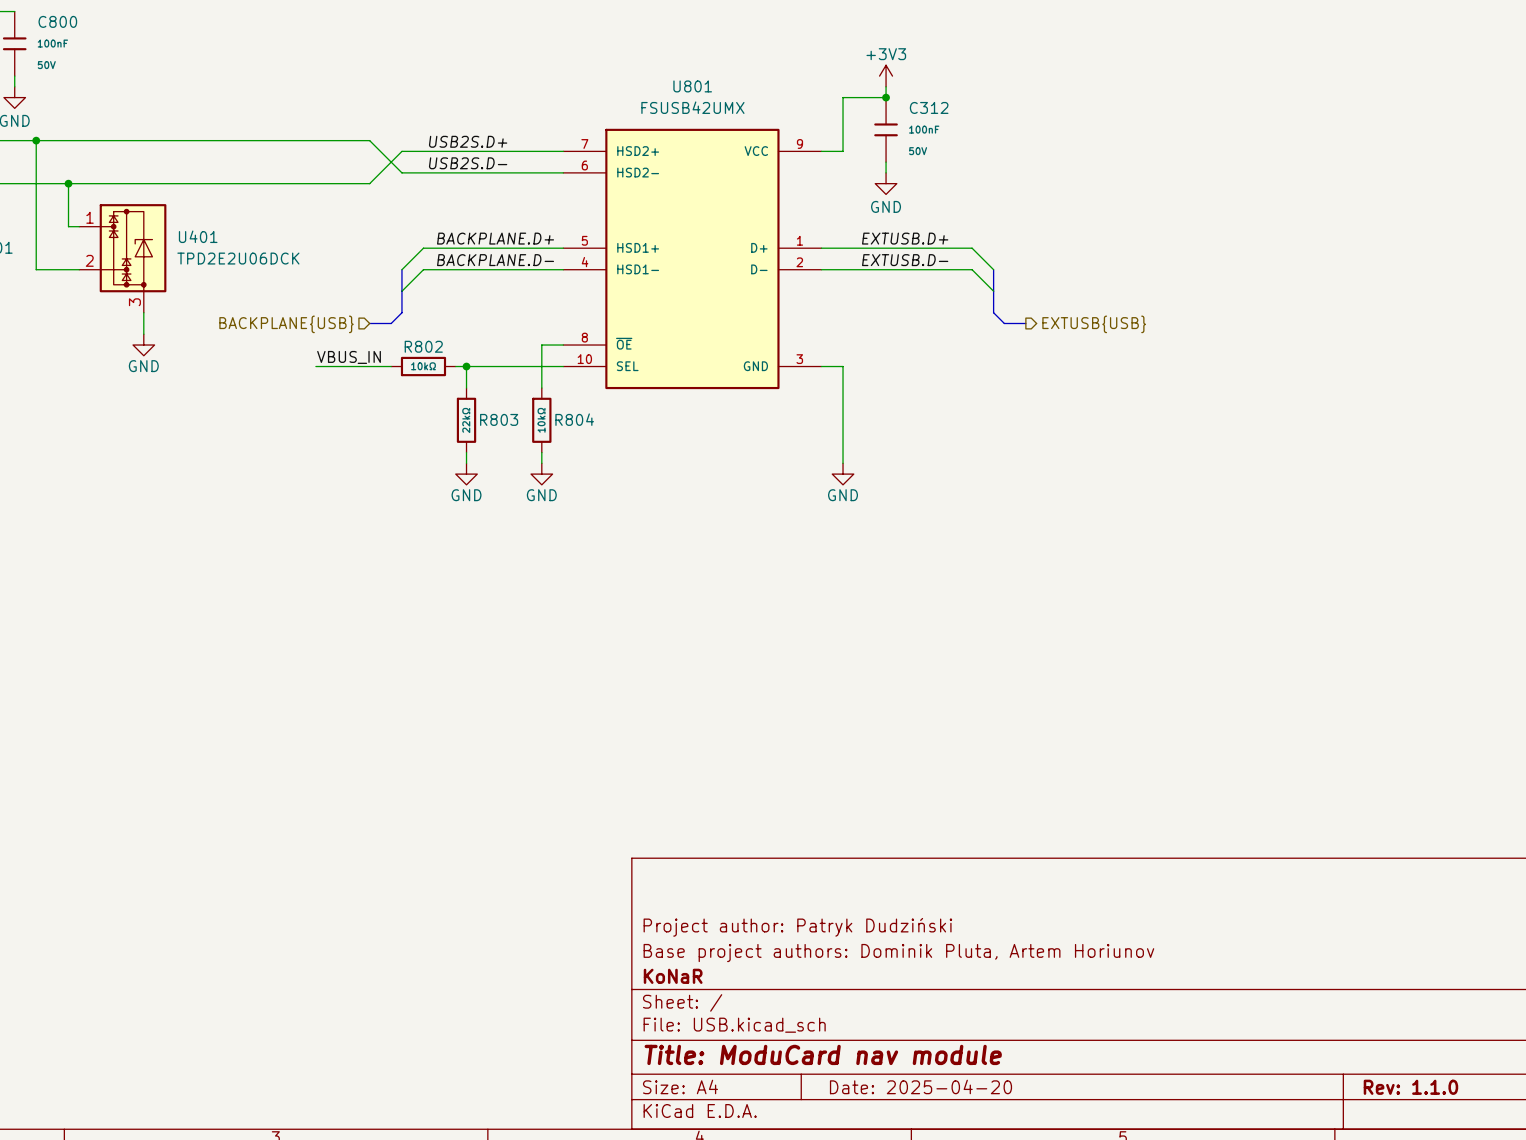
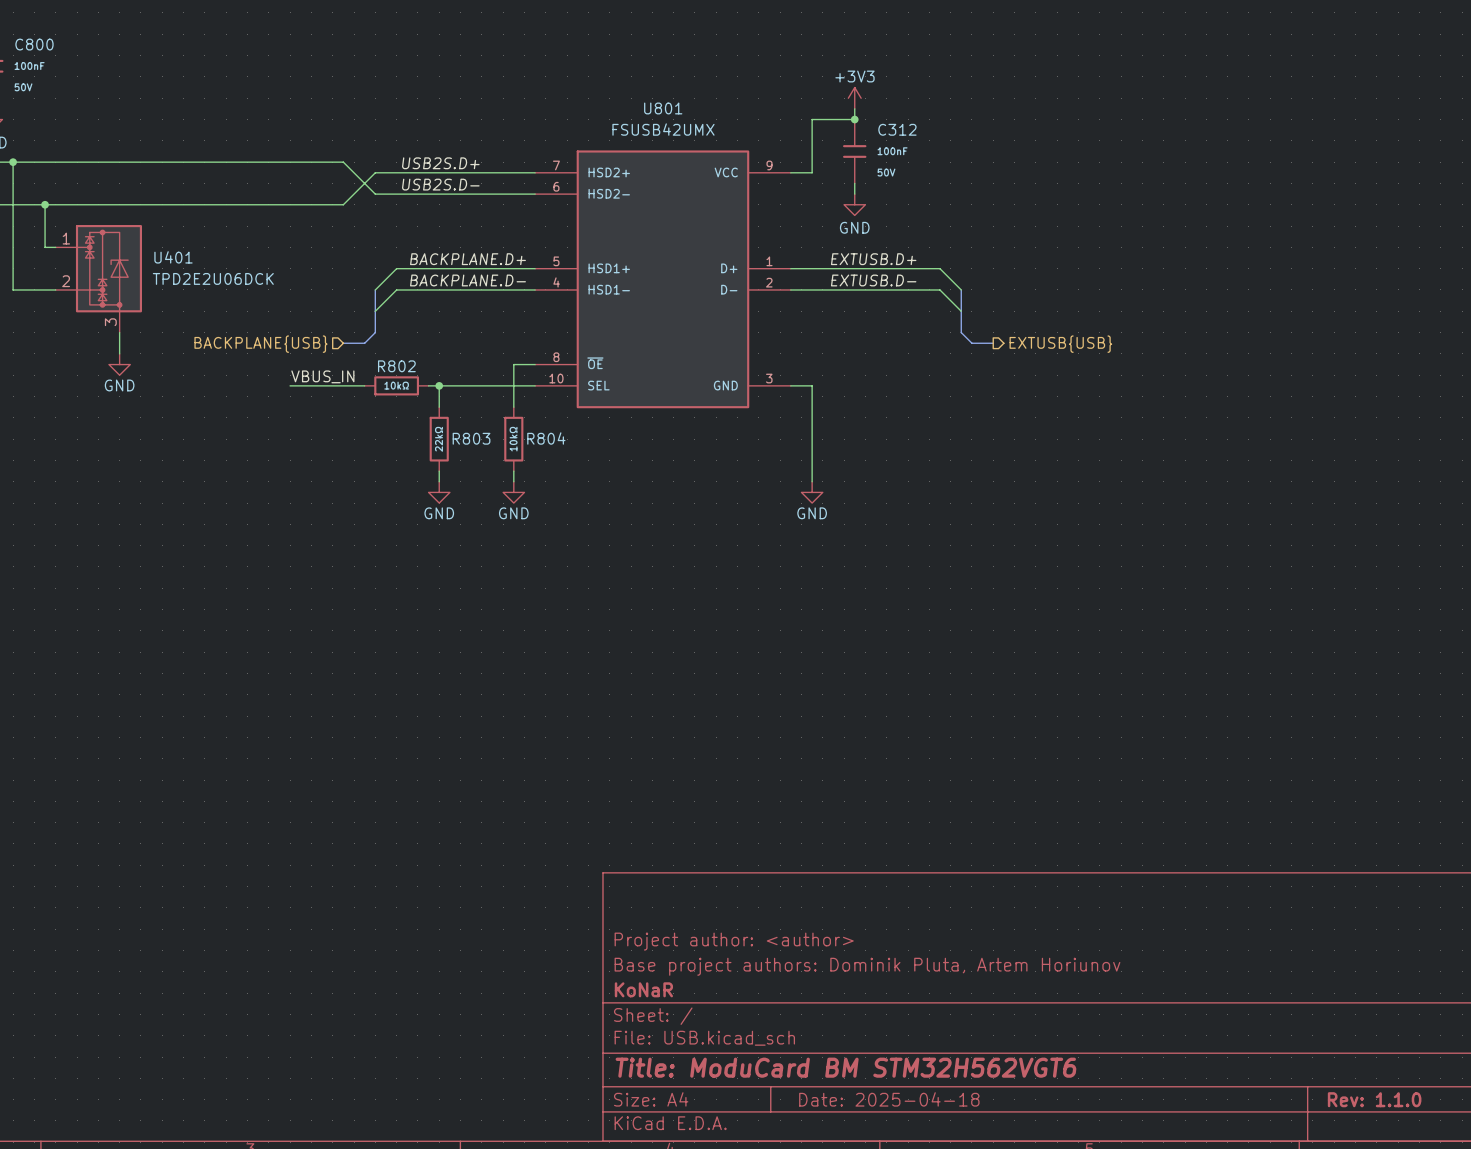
title block: Project author: Patryk Dudziński (797, 927) -> Project author: <author> (734, 941)
title block: Title: ModuCard nav module (823, 1054) -> Title: ModuCard BM STM32H562VGT6 (845, 1067)
title block: Date: 2025-04-20 (920, 1086) -> Date: 2025-04-18 (889, 1099)

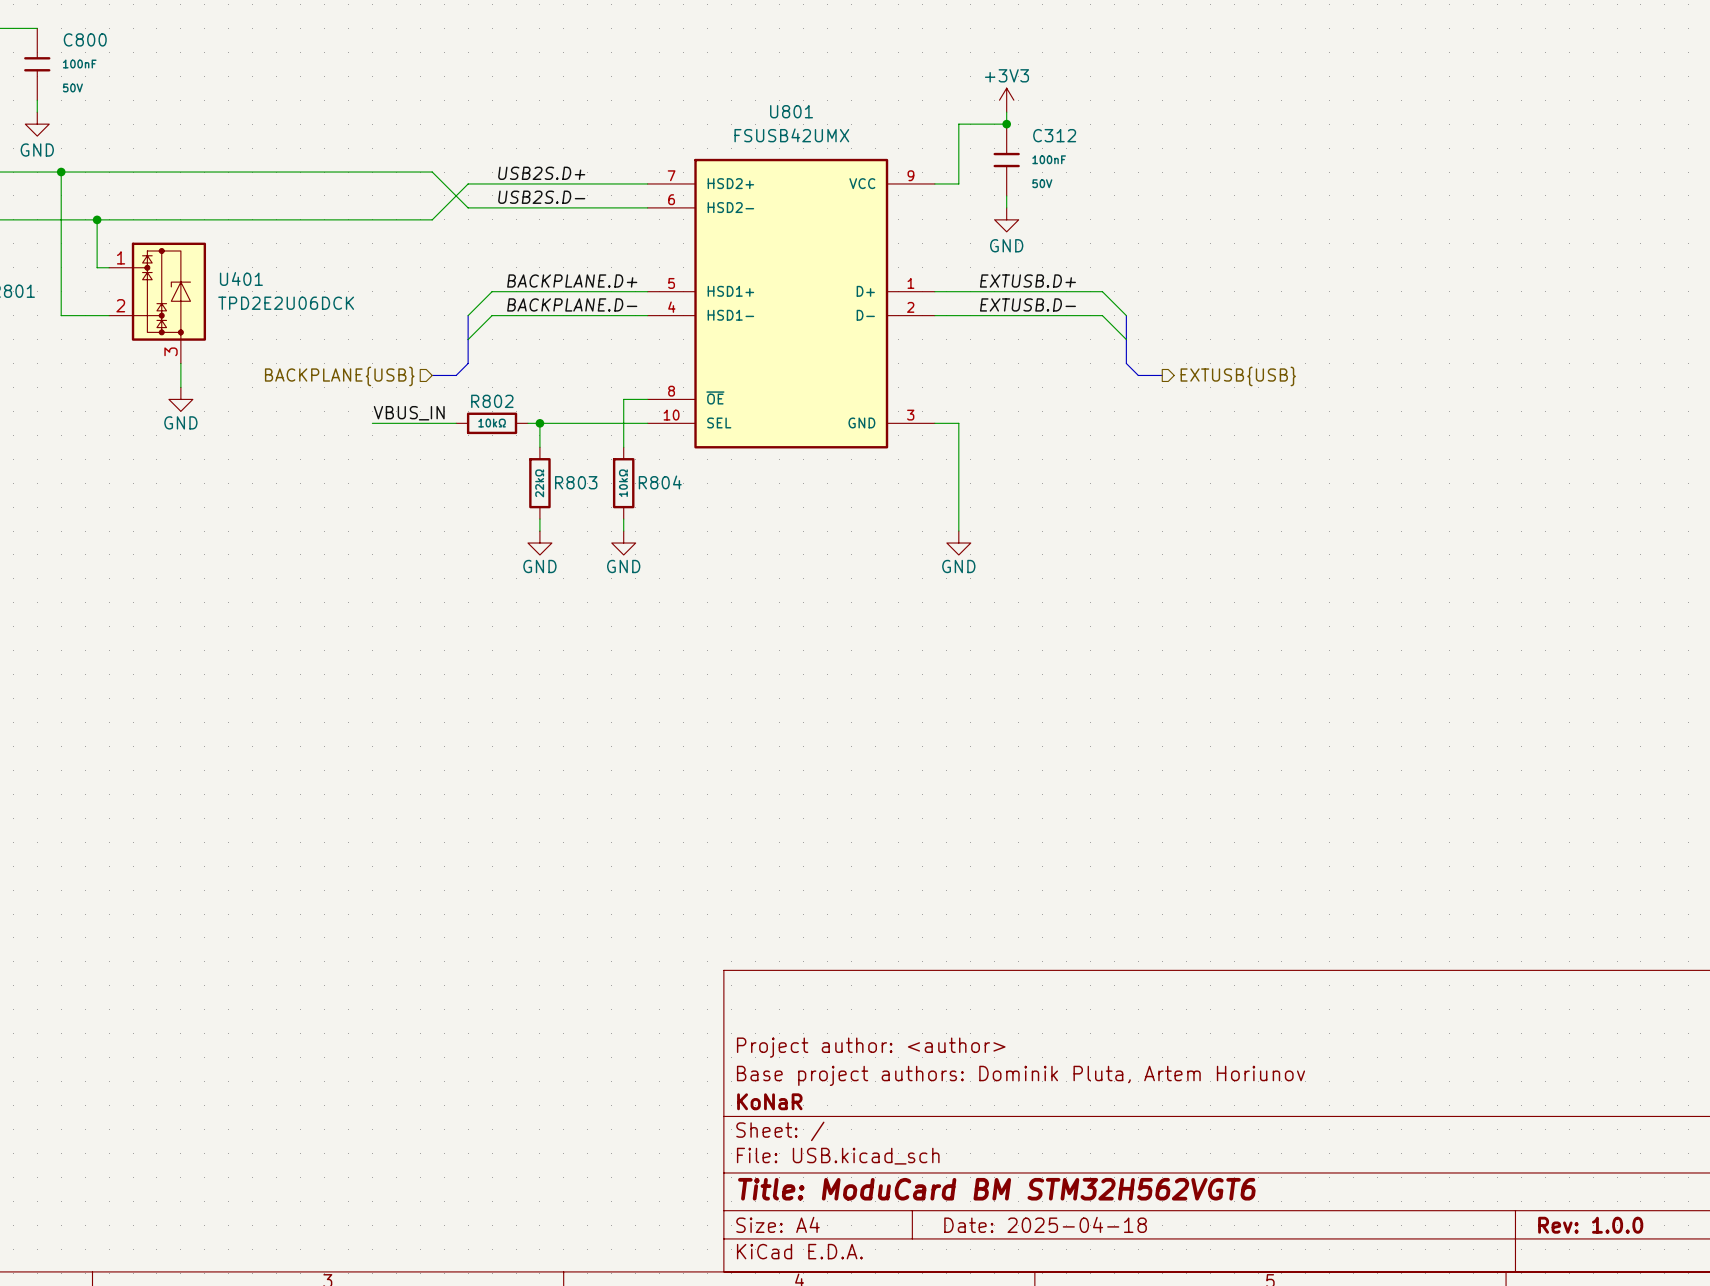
title block: Rev: 1.1.0 (1374, 1099) -> Rev: 1.0.0 (1590, 1225)

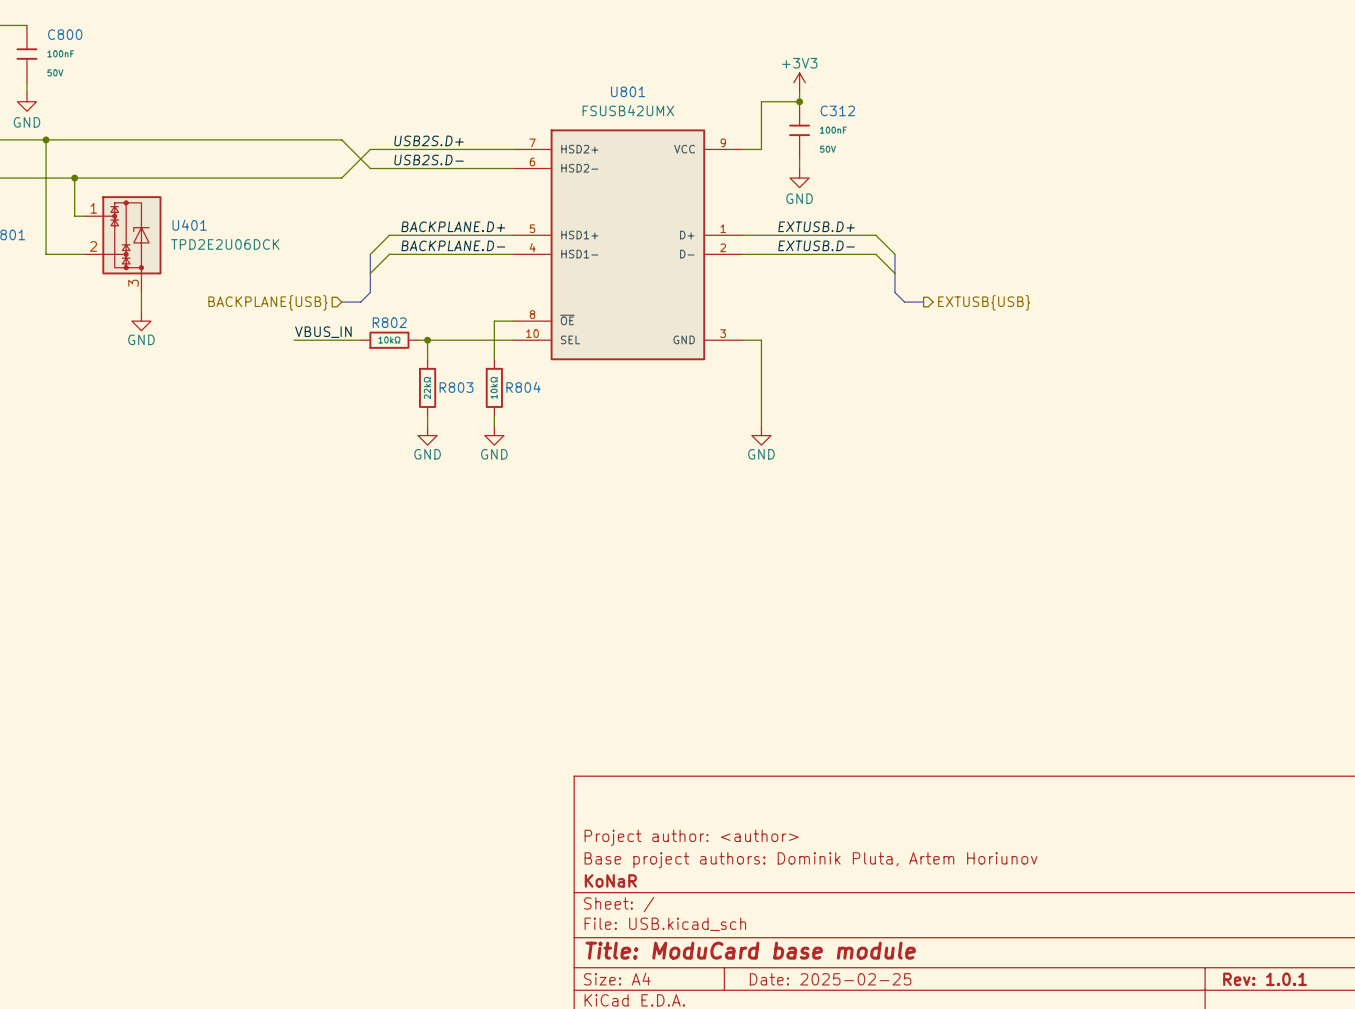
title block: Title: ModuCard BM STM32H562VGT6 (996, 1189) -> Title: ModuCard base module (750, 950)
title block: Date: 2025-04-18 (1045, 1224) -> Date: 2025-02-25 (830, 979)
title block: Rev: 1.0.0 (1590, 1225) -> Rev: 1.0.1 (1265, 979)

